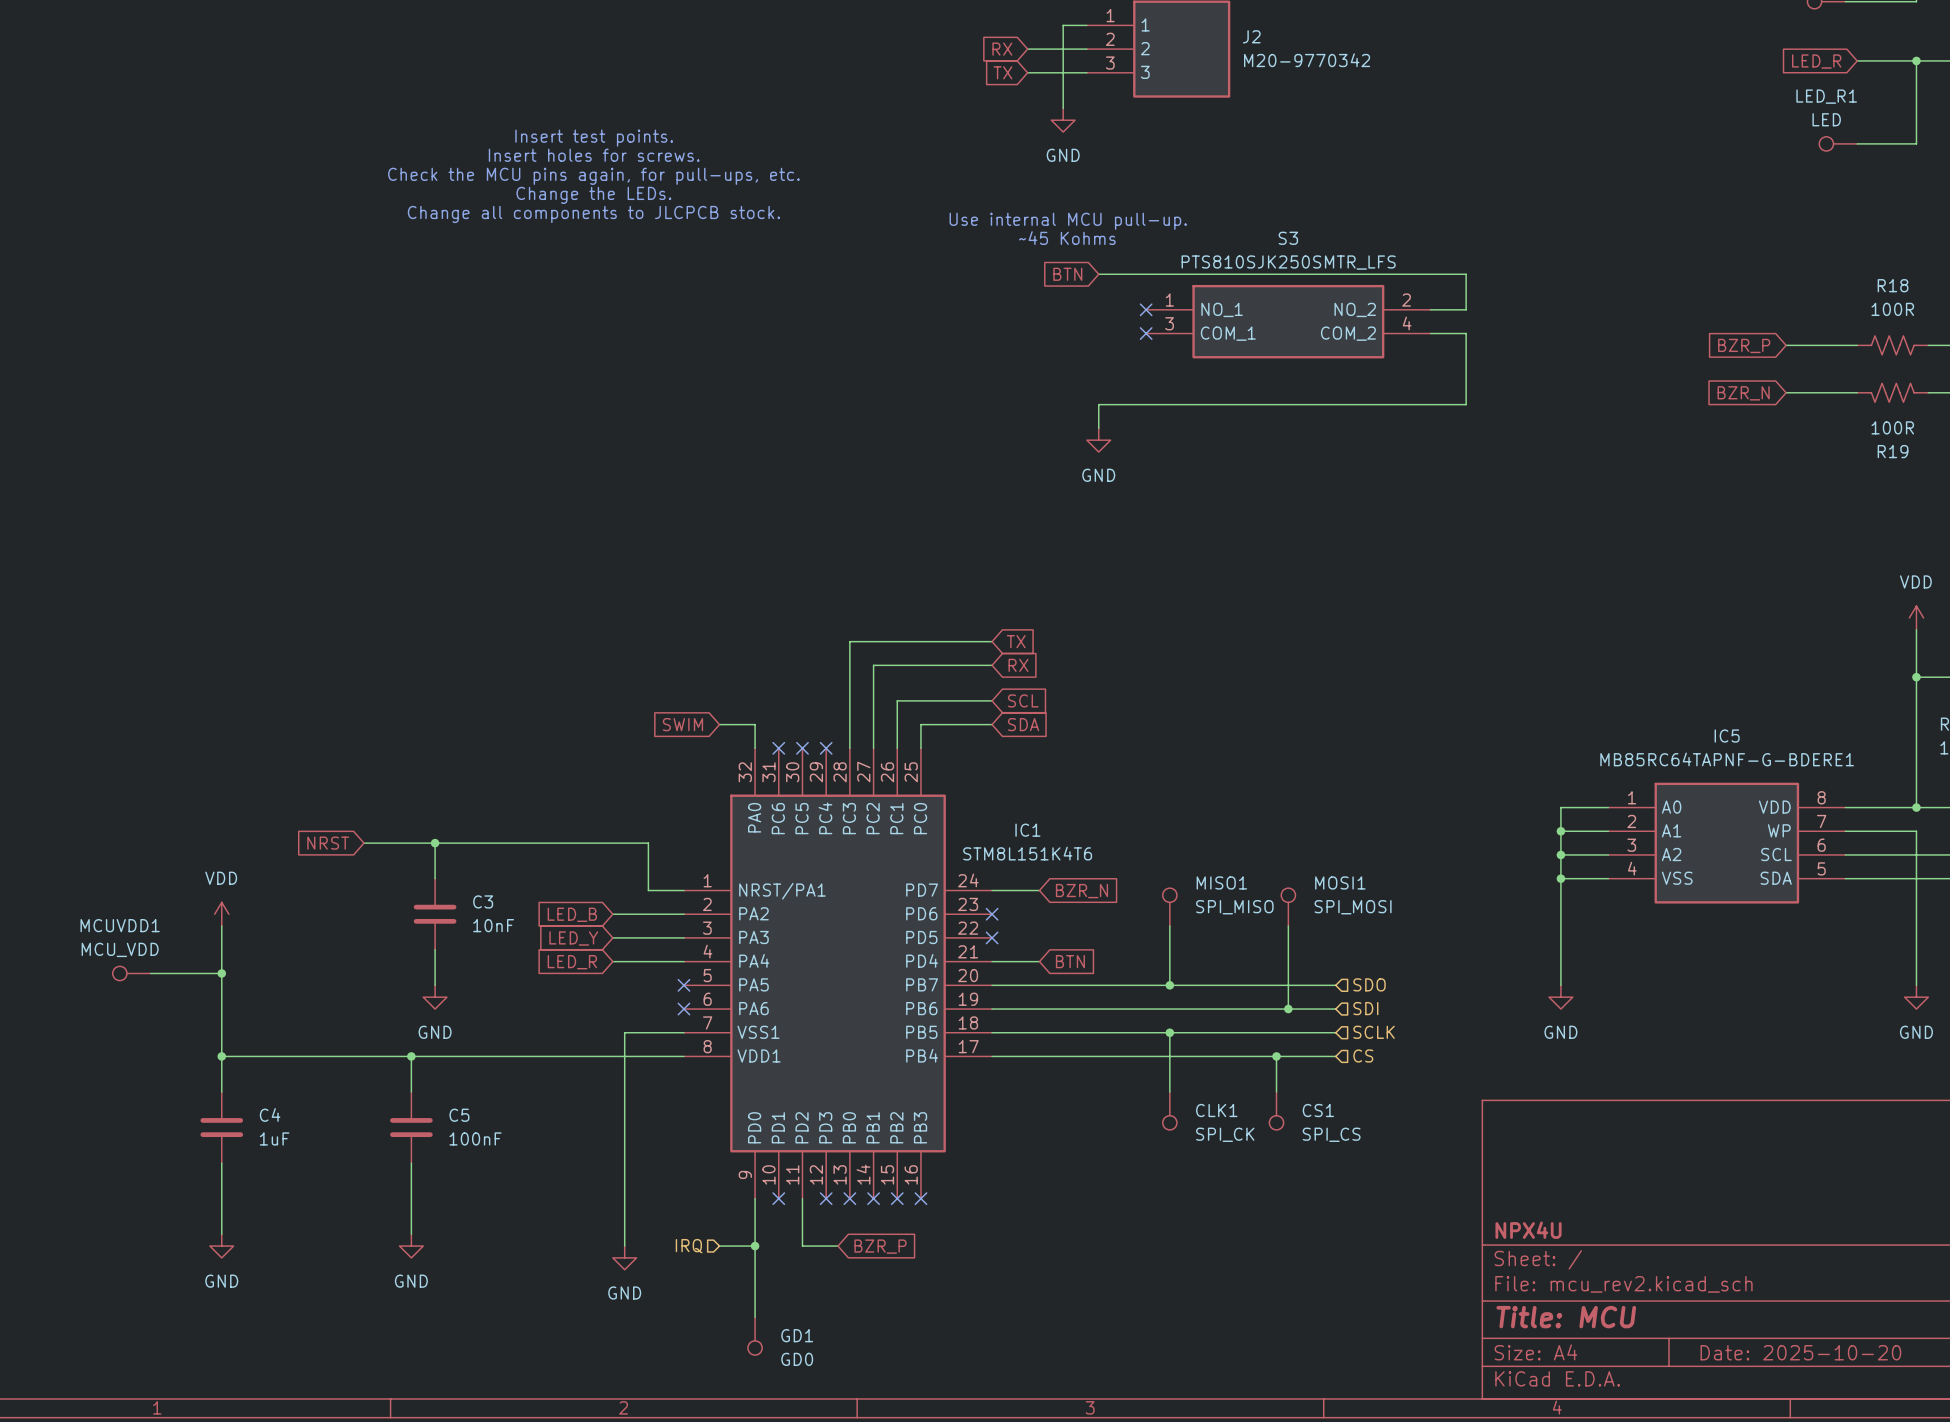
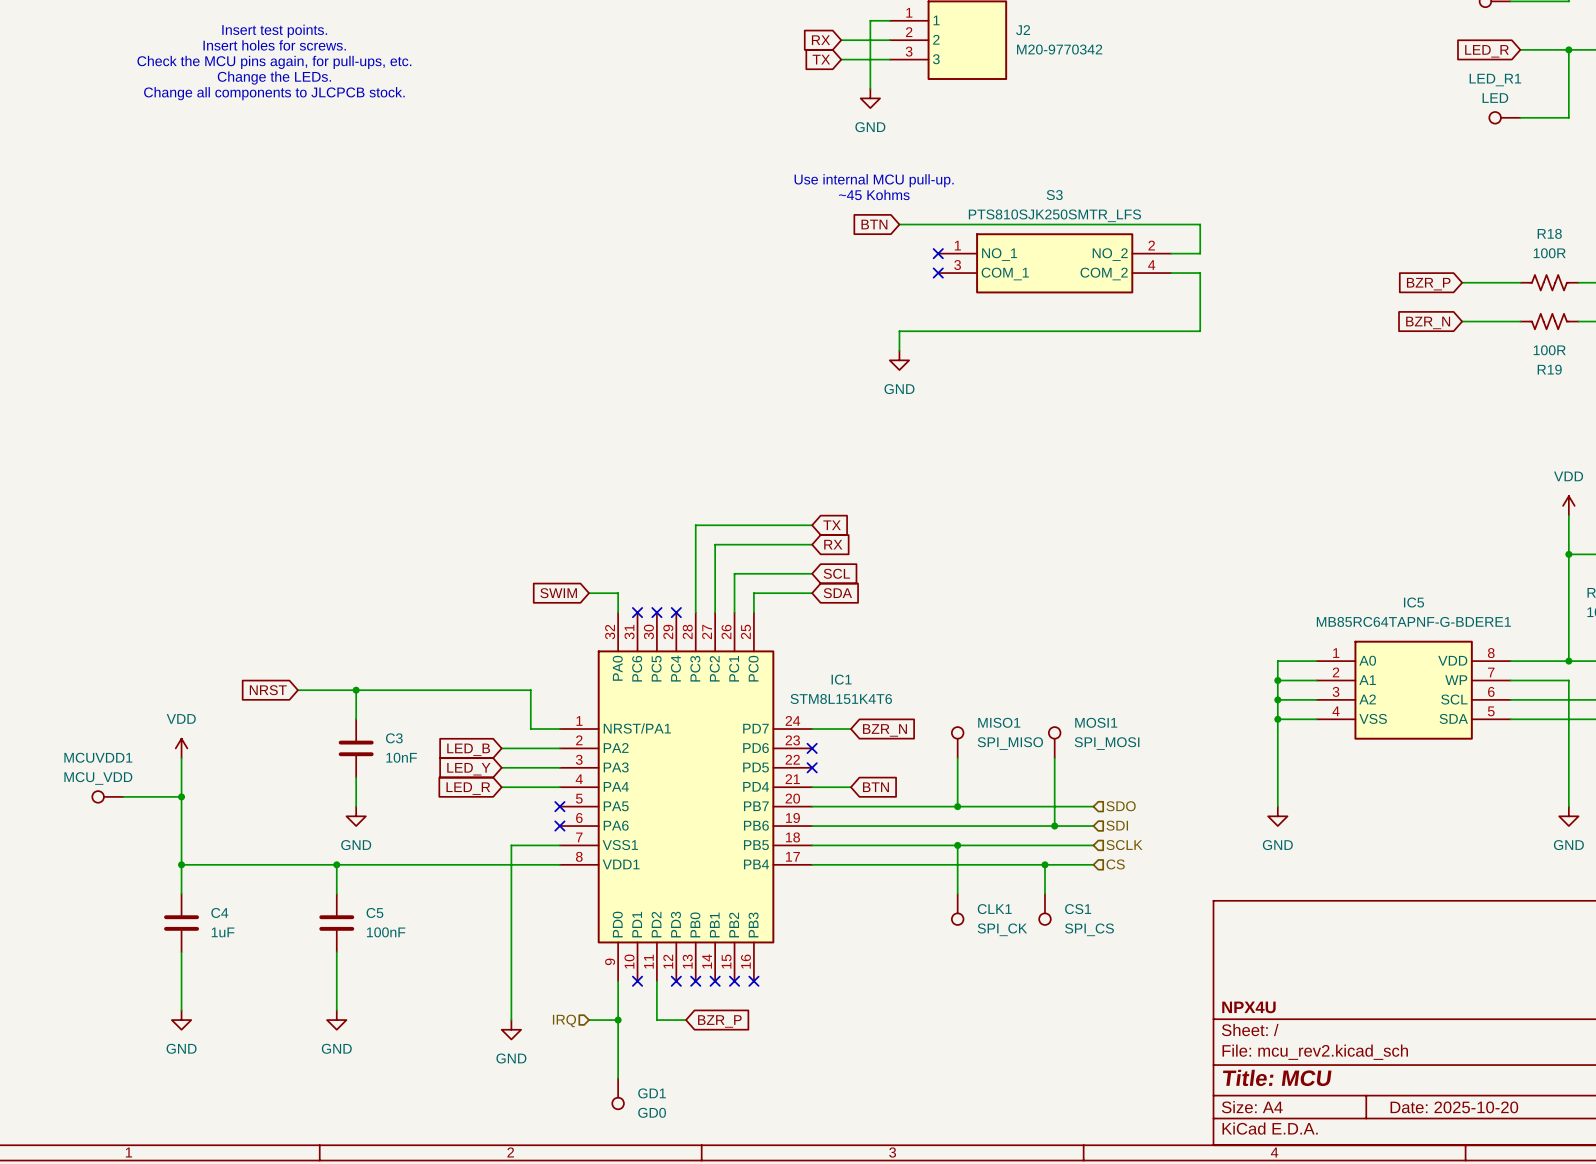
text: none -> Insert test points. (274, 31)
text: none -> Insert holes for screws. (274, 45)
text: none -> Check the MCU pins again, for pull-ups, etc. (274, 62)
text: none -> Change the LEDs. (274, 78)
text: none -> Change all components to JLCPCB stock. (274, 93)
text: Insert test points. (594, 138) -> none
text: Insert holes for screws. (594, 155) -> none
text: Check the MCU pins again, for pull-ups, etc. (593, 176) -> none
text: Change the LEDs. (593, 195) -> none
text: Change all components to JLCPCB stock. (593, 214) -> none

